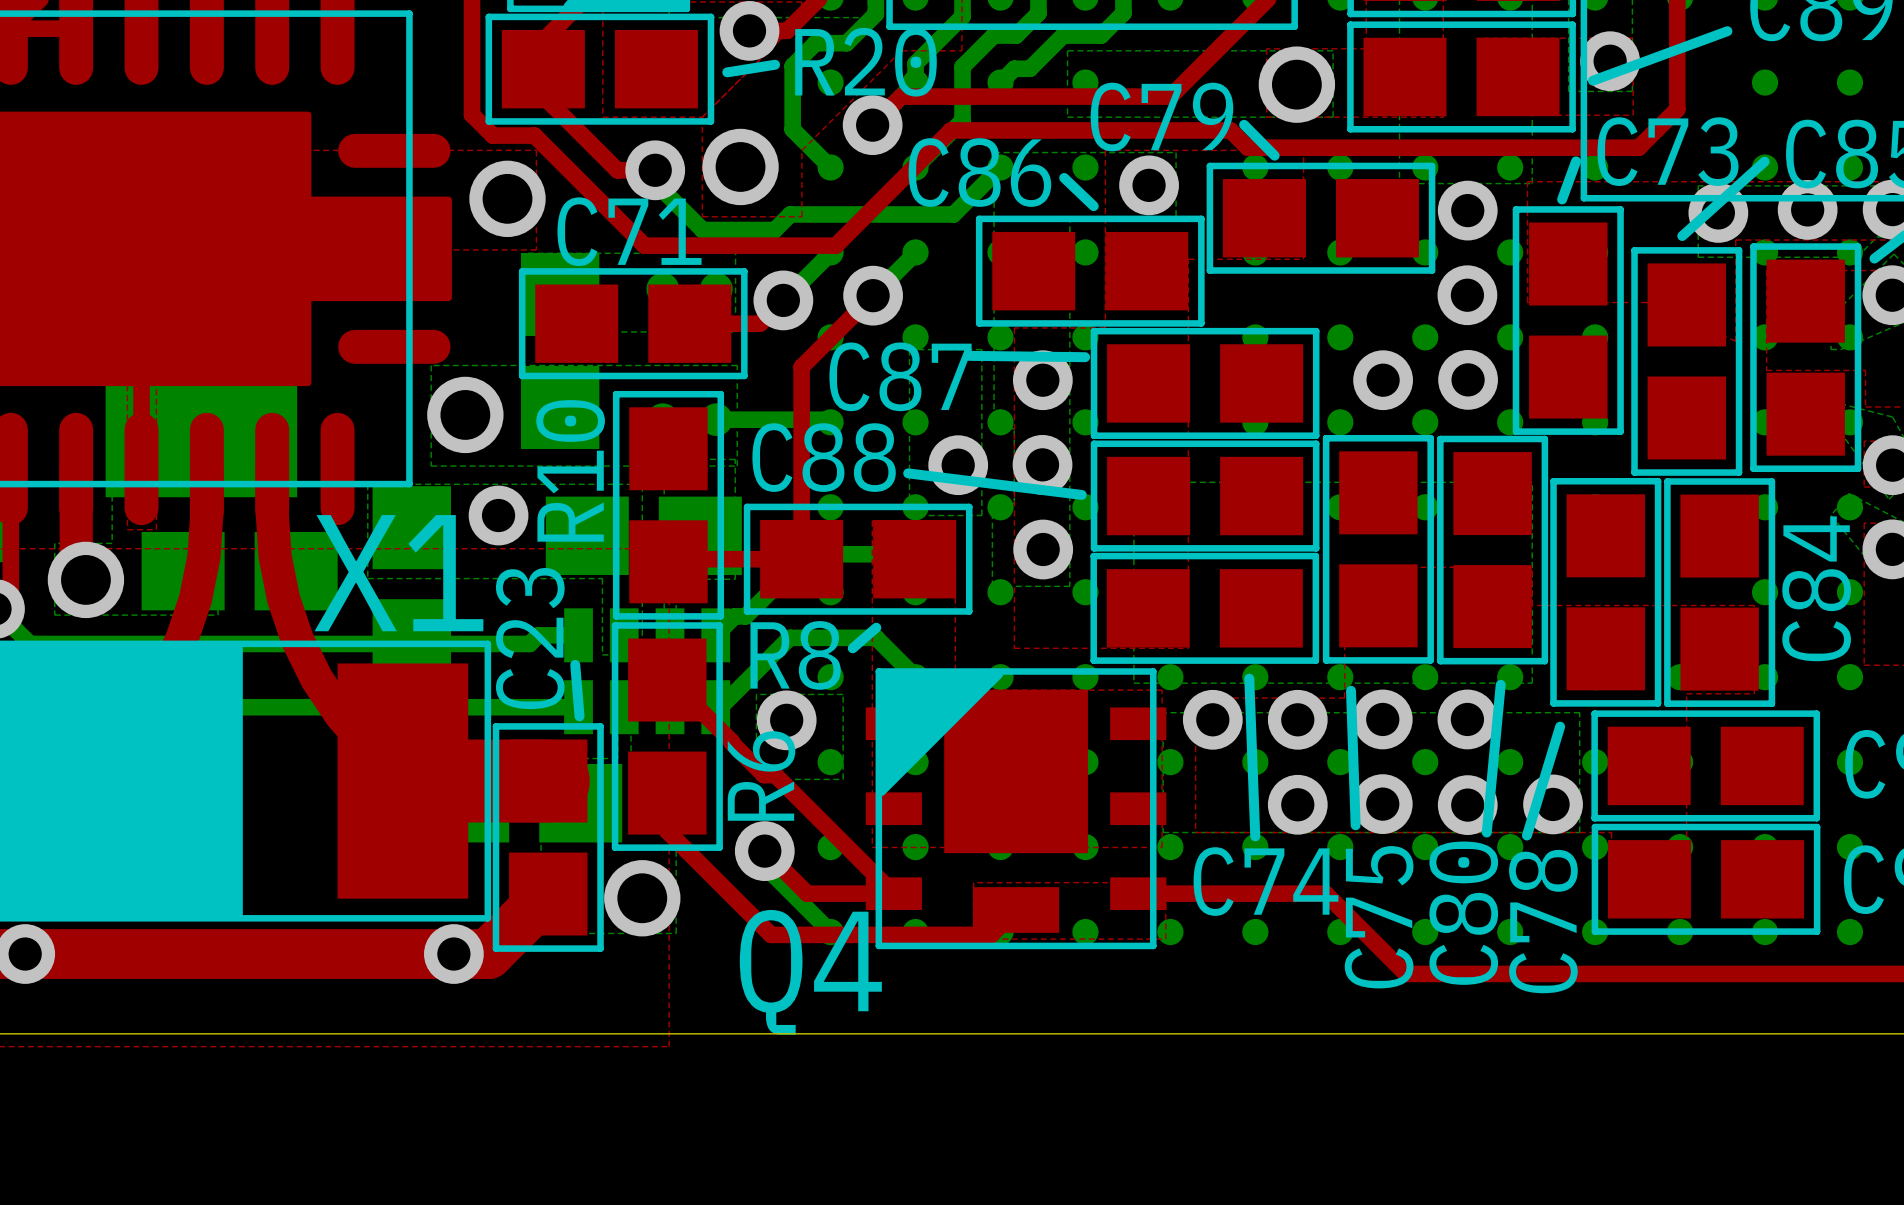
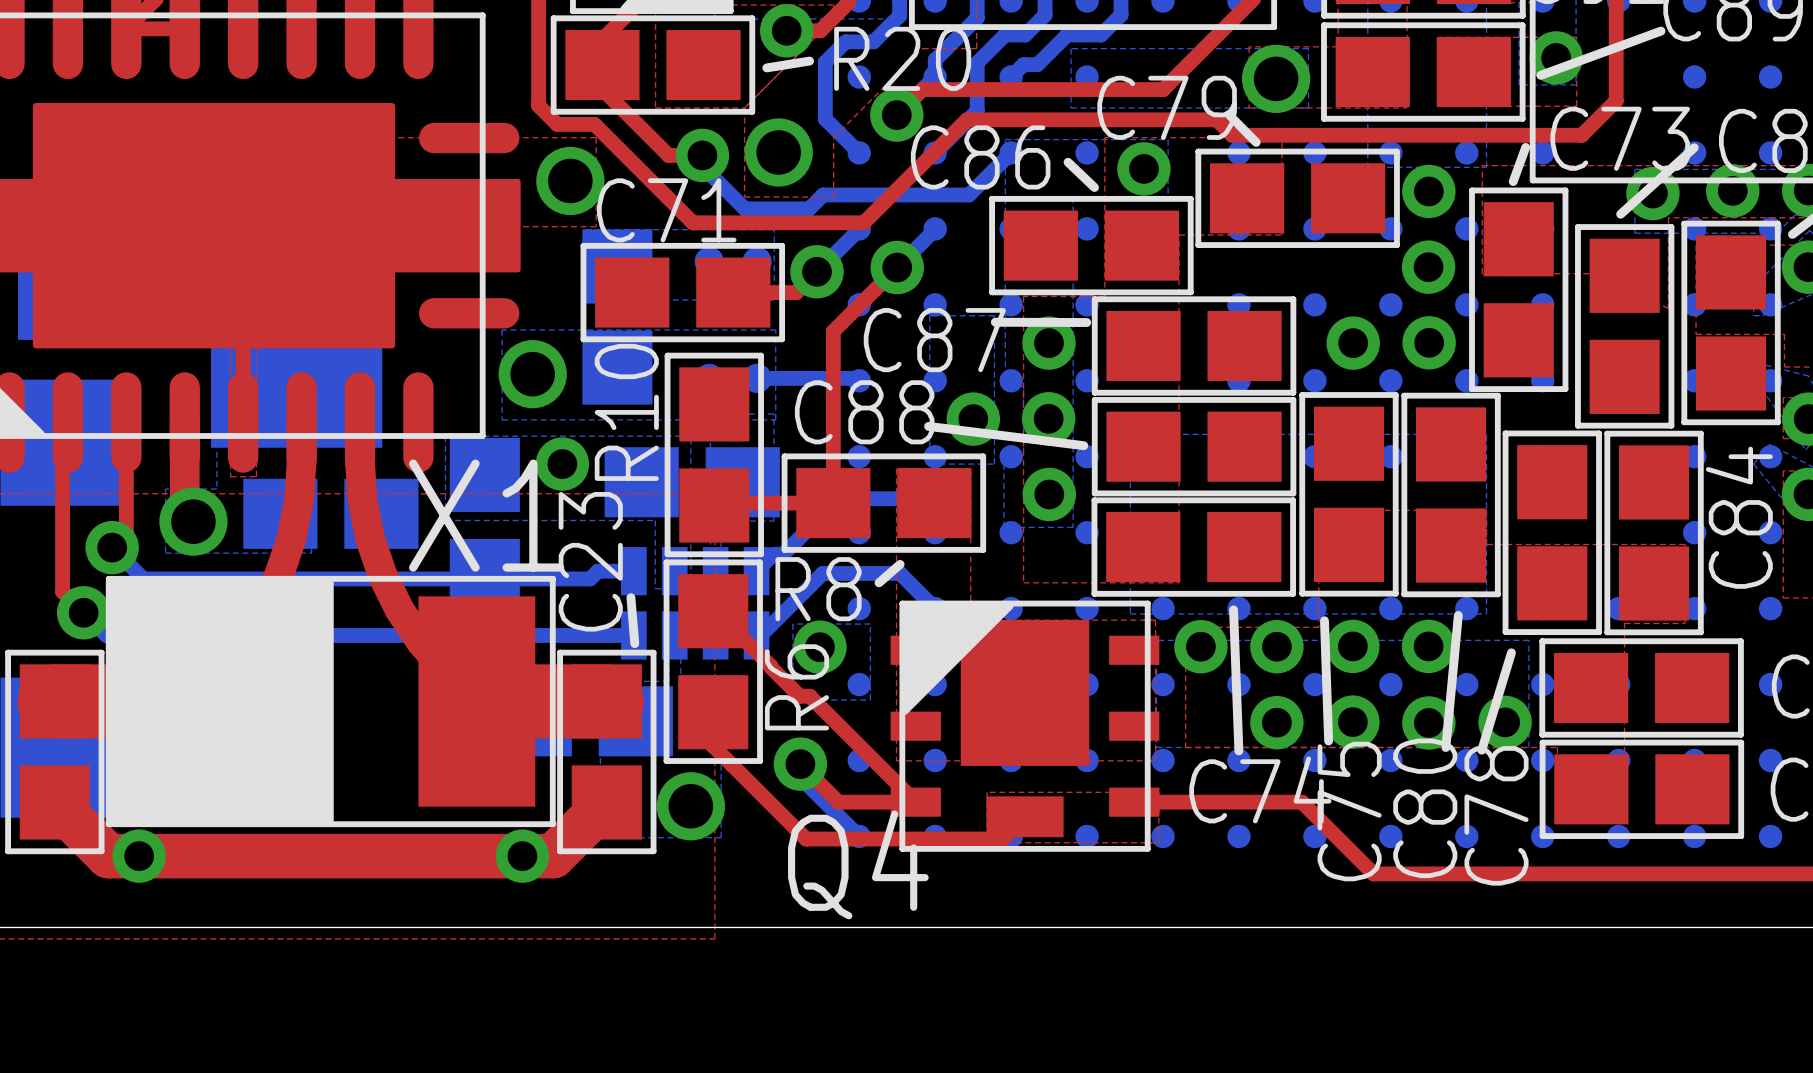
line: (968, 355) (1085, 357) -> (995, 322) (1086, 322)

